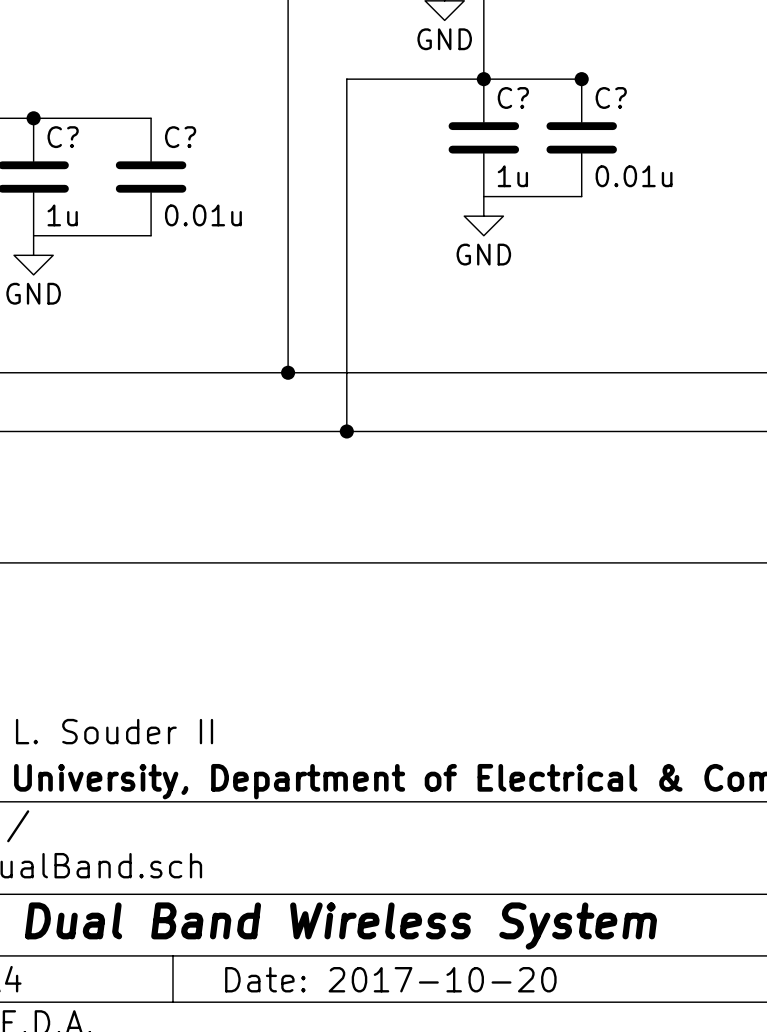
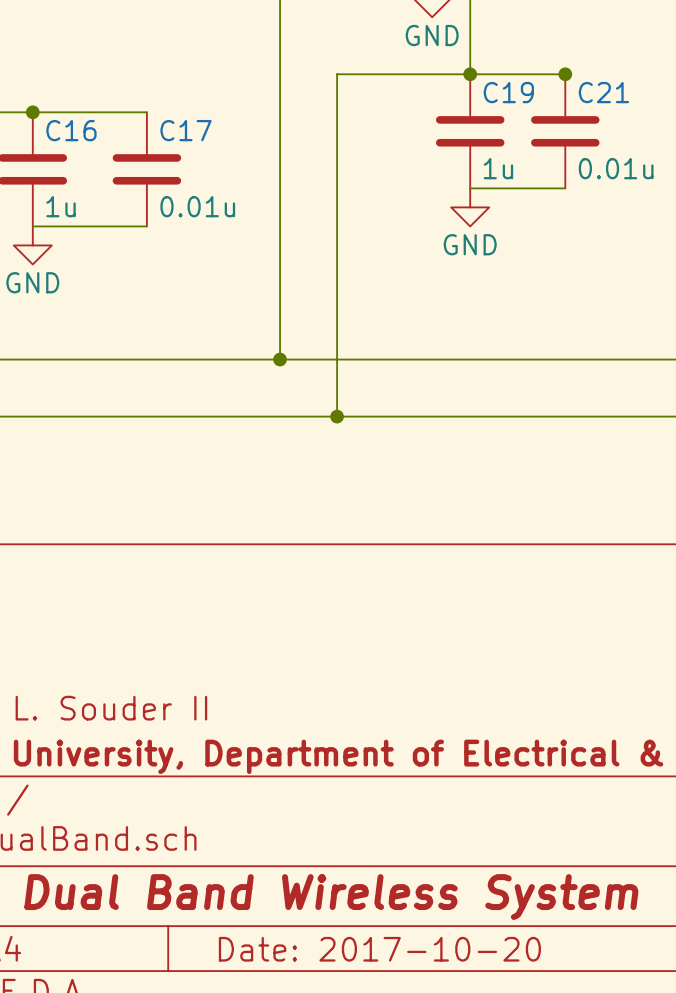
C? name: C? (513, 97) -> C19 (508, 92)
C? name: C? (611, 97) -> C21 (603, 92)
C? name: C? (63, 137) -> C16 (71, 130)
C? name: C? (180, 137) -> C17 (185, 130)

